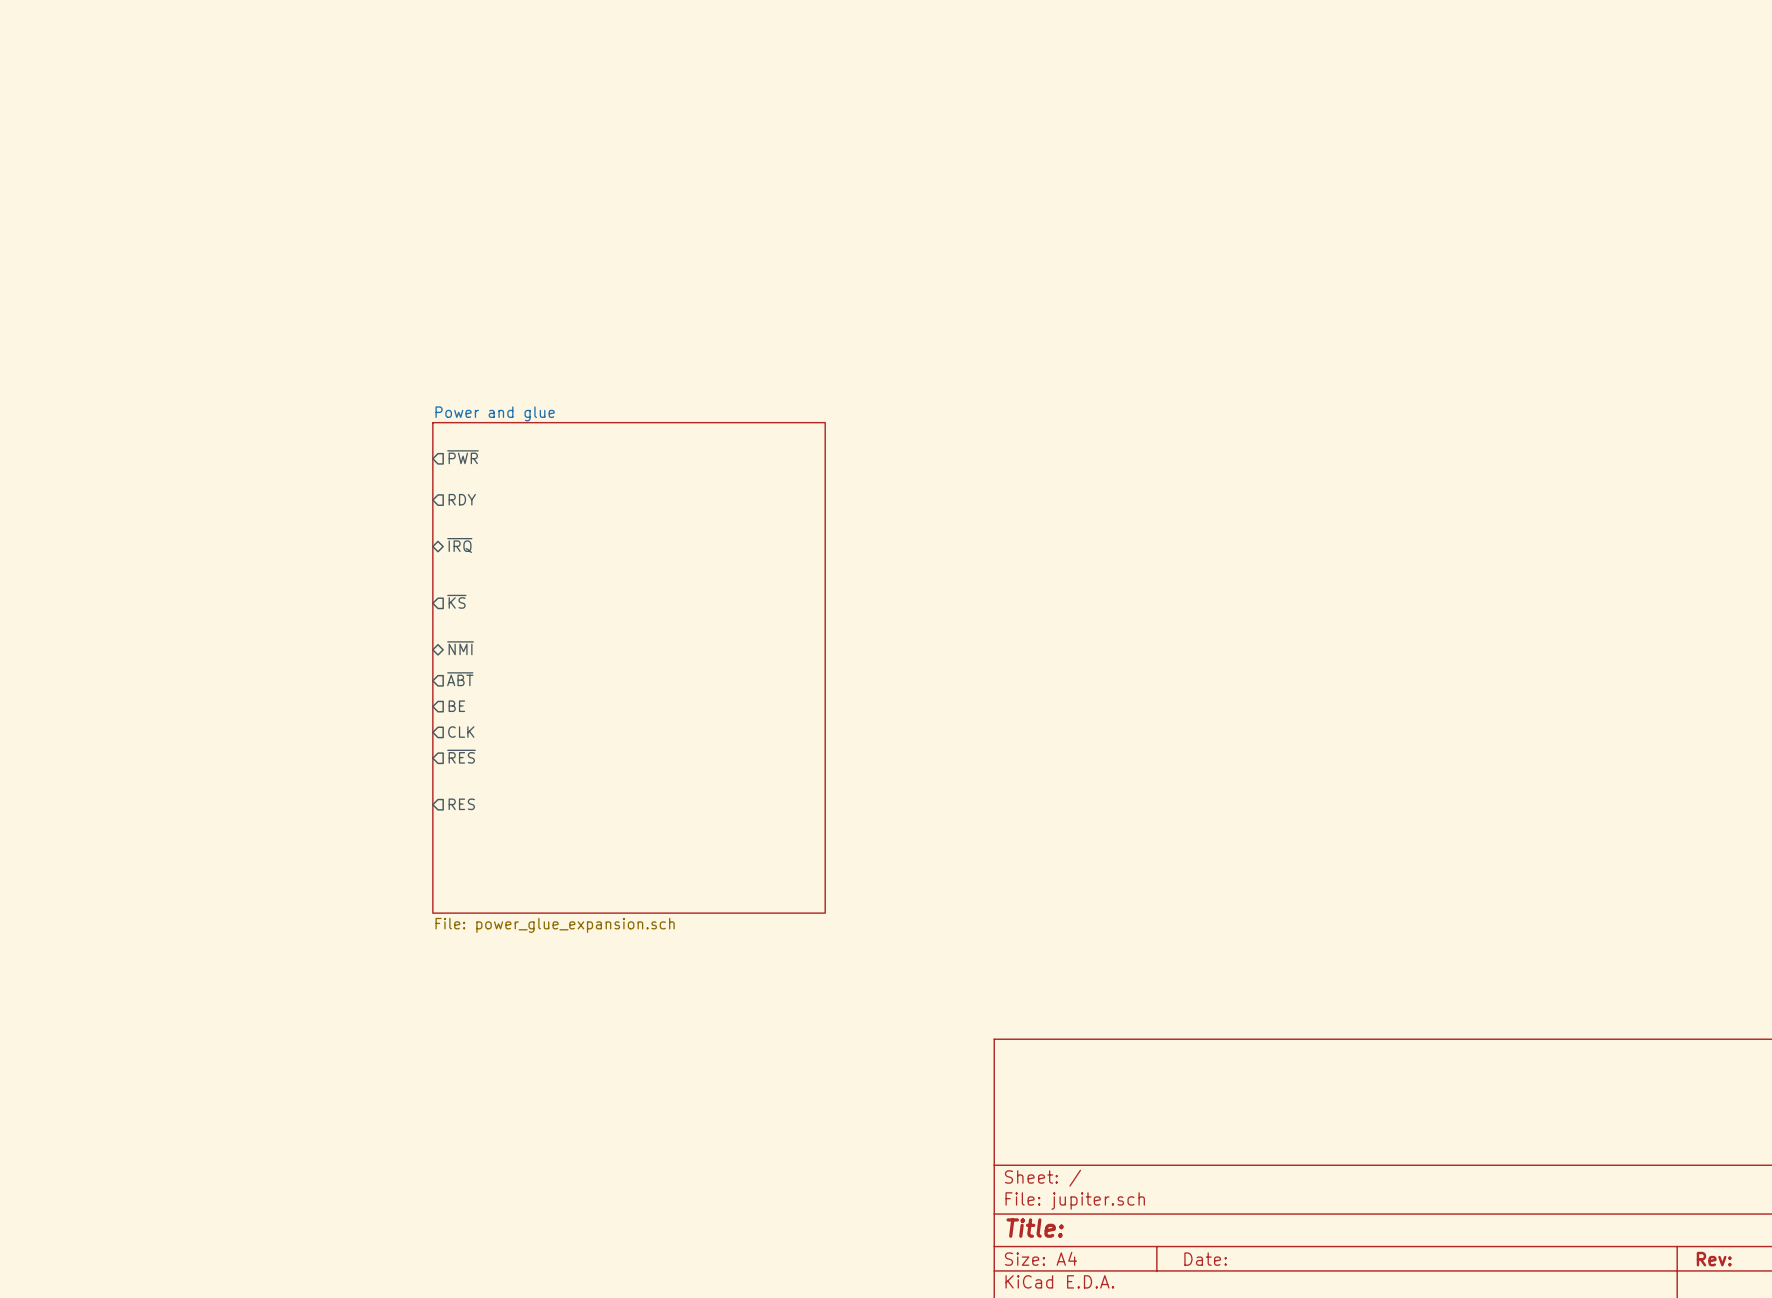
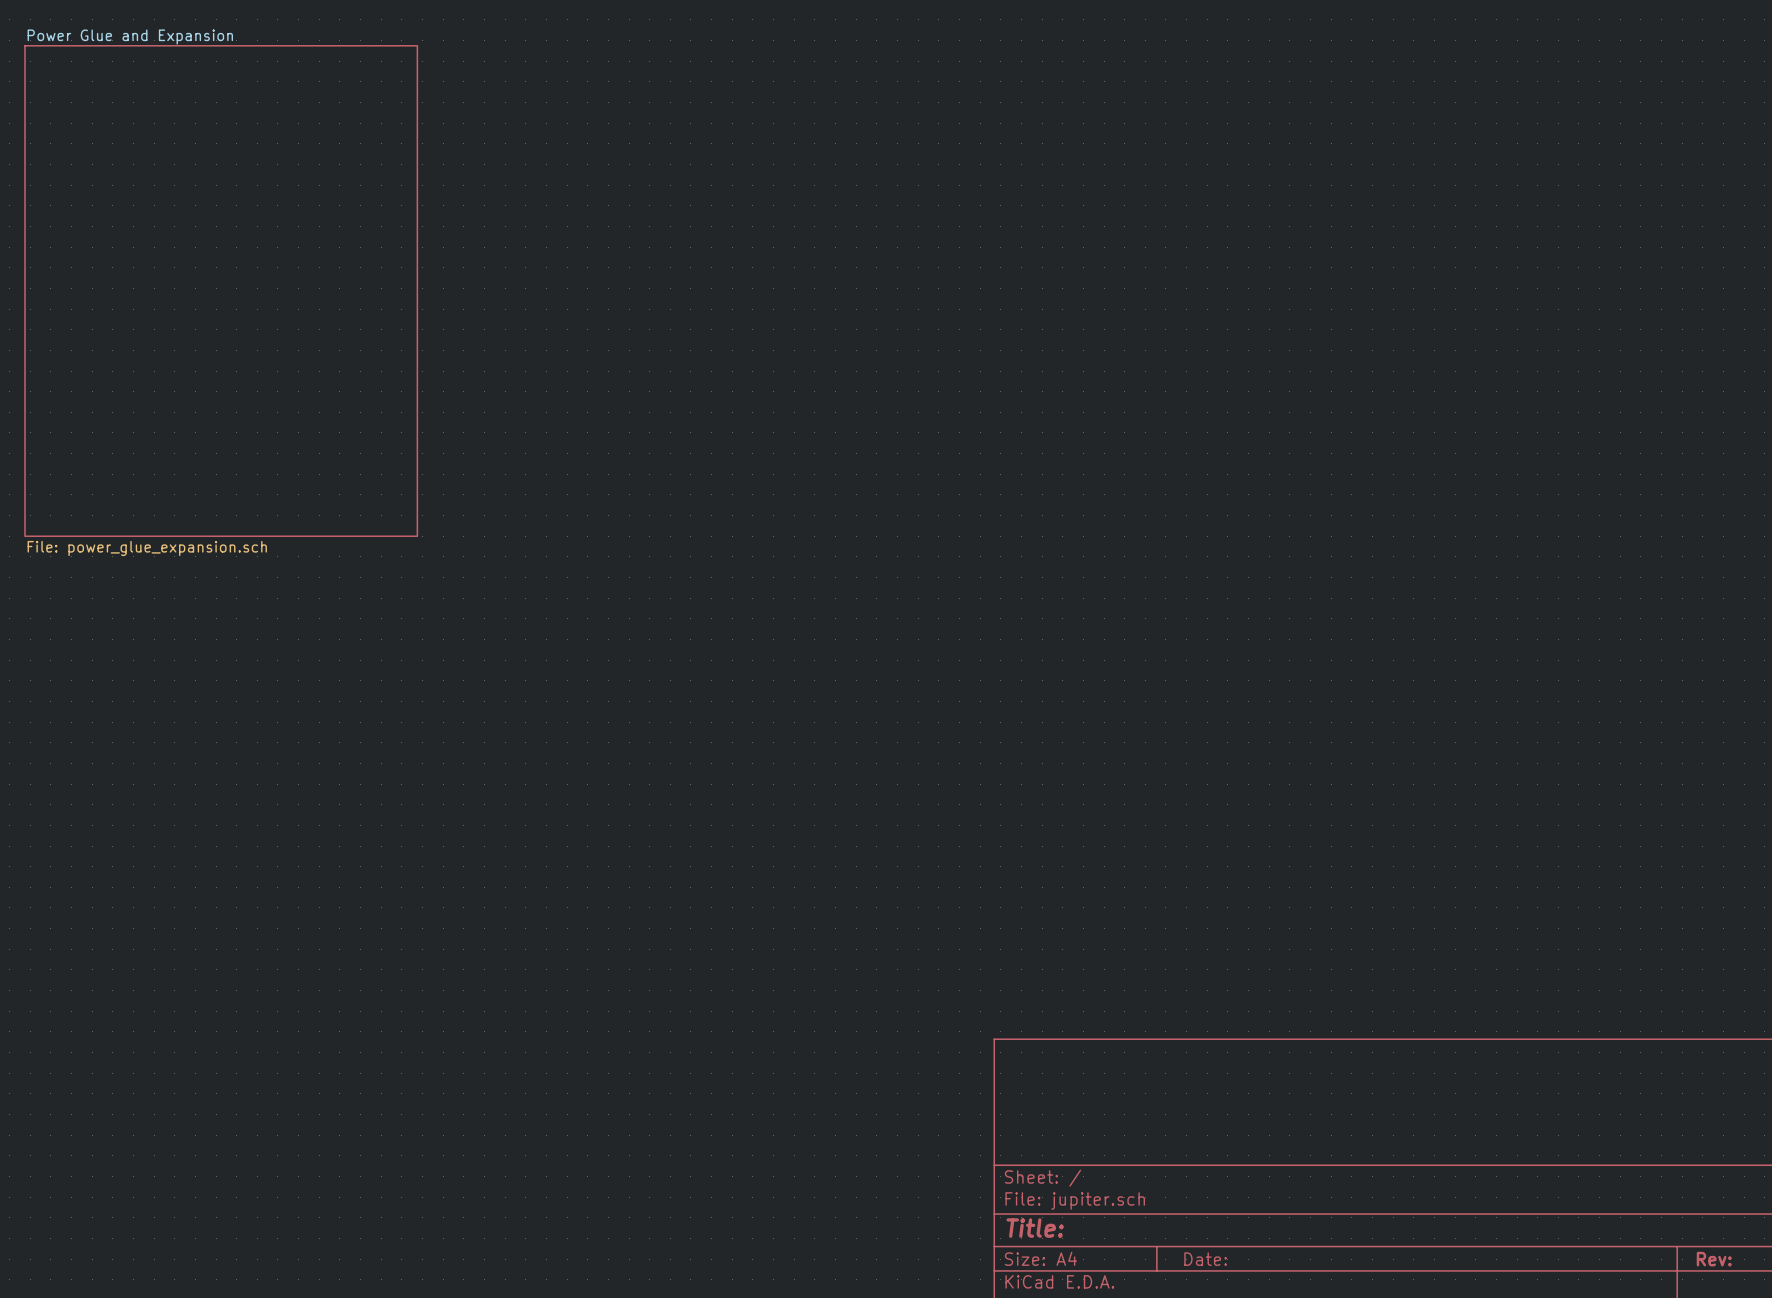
sheet Power Glue and Expansion: none -> File: power_glue_expansion.sch (221, 291)
sheet pin: ~{PWR} (463, 457) -> none
sheet pin: RDY (462, 499) -> none
sheet pin: ~{IRQ} (459, 545) -> none
sheet pin: ~{KS} (456, 601) -> none
sheet pin: ~{NMI} (460, 648) -> none
sheet Power and glue: File: power_glue_expansion.sch (629, 667) -> none
sheet pin: ~{ABT} (460, 679) -> none
sheet pin: BE (456, 706) -> none
sheet pin: CLK (461, 732) -> none
sheet pin: ~{RES} (461, 756) -> none
sheet pin: RES (461, 804) -> none

